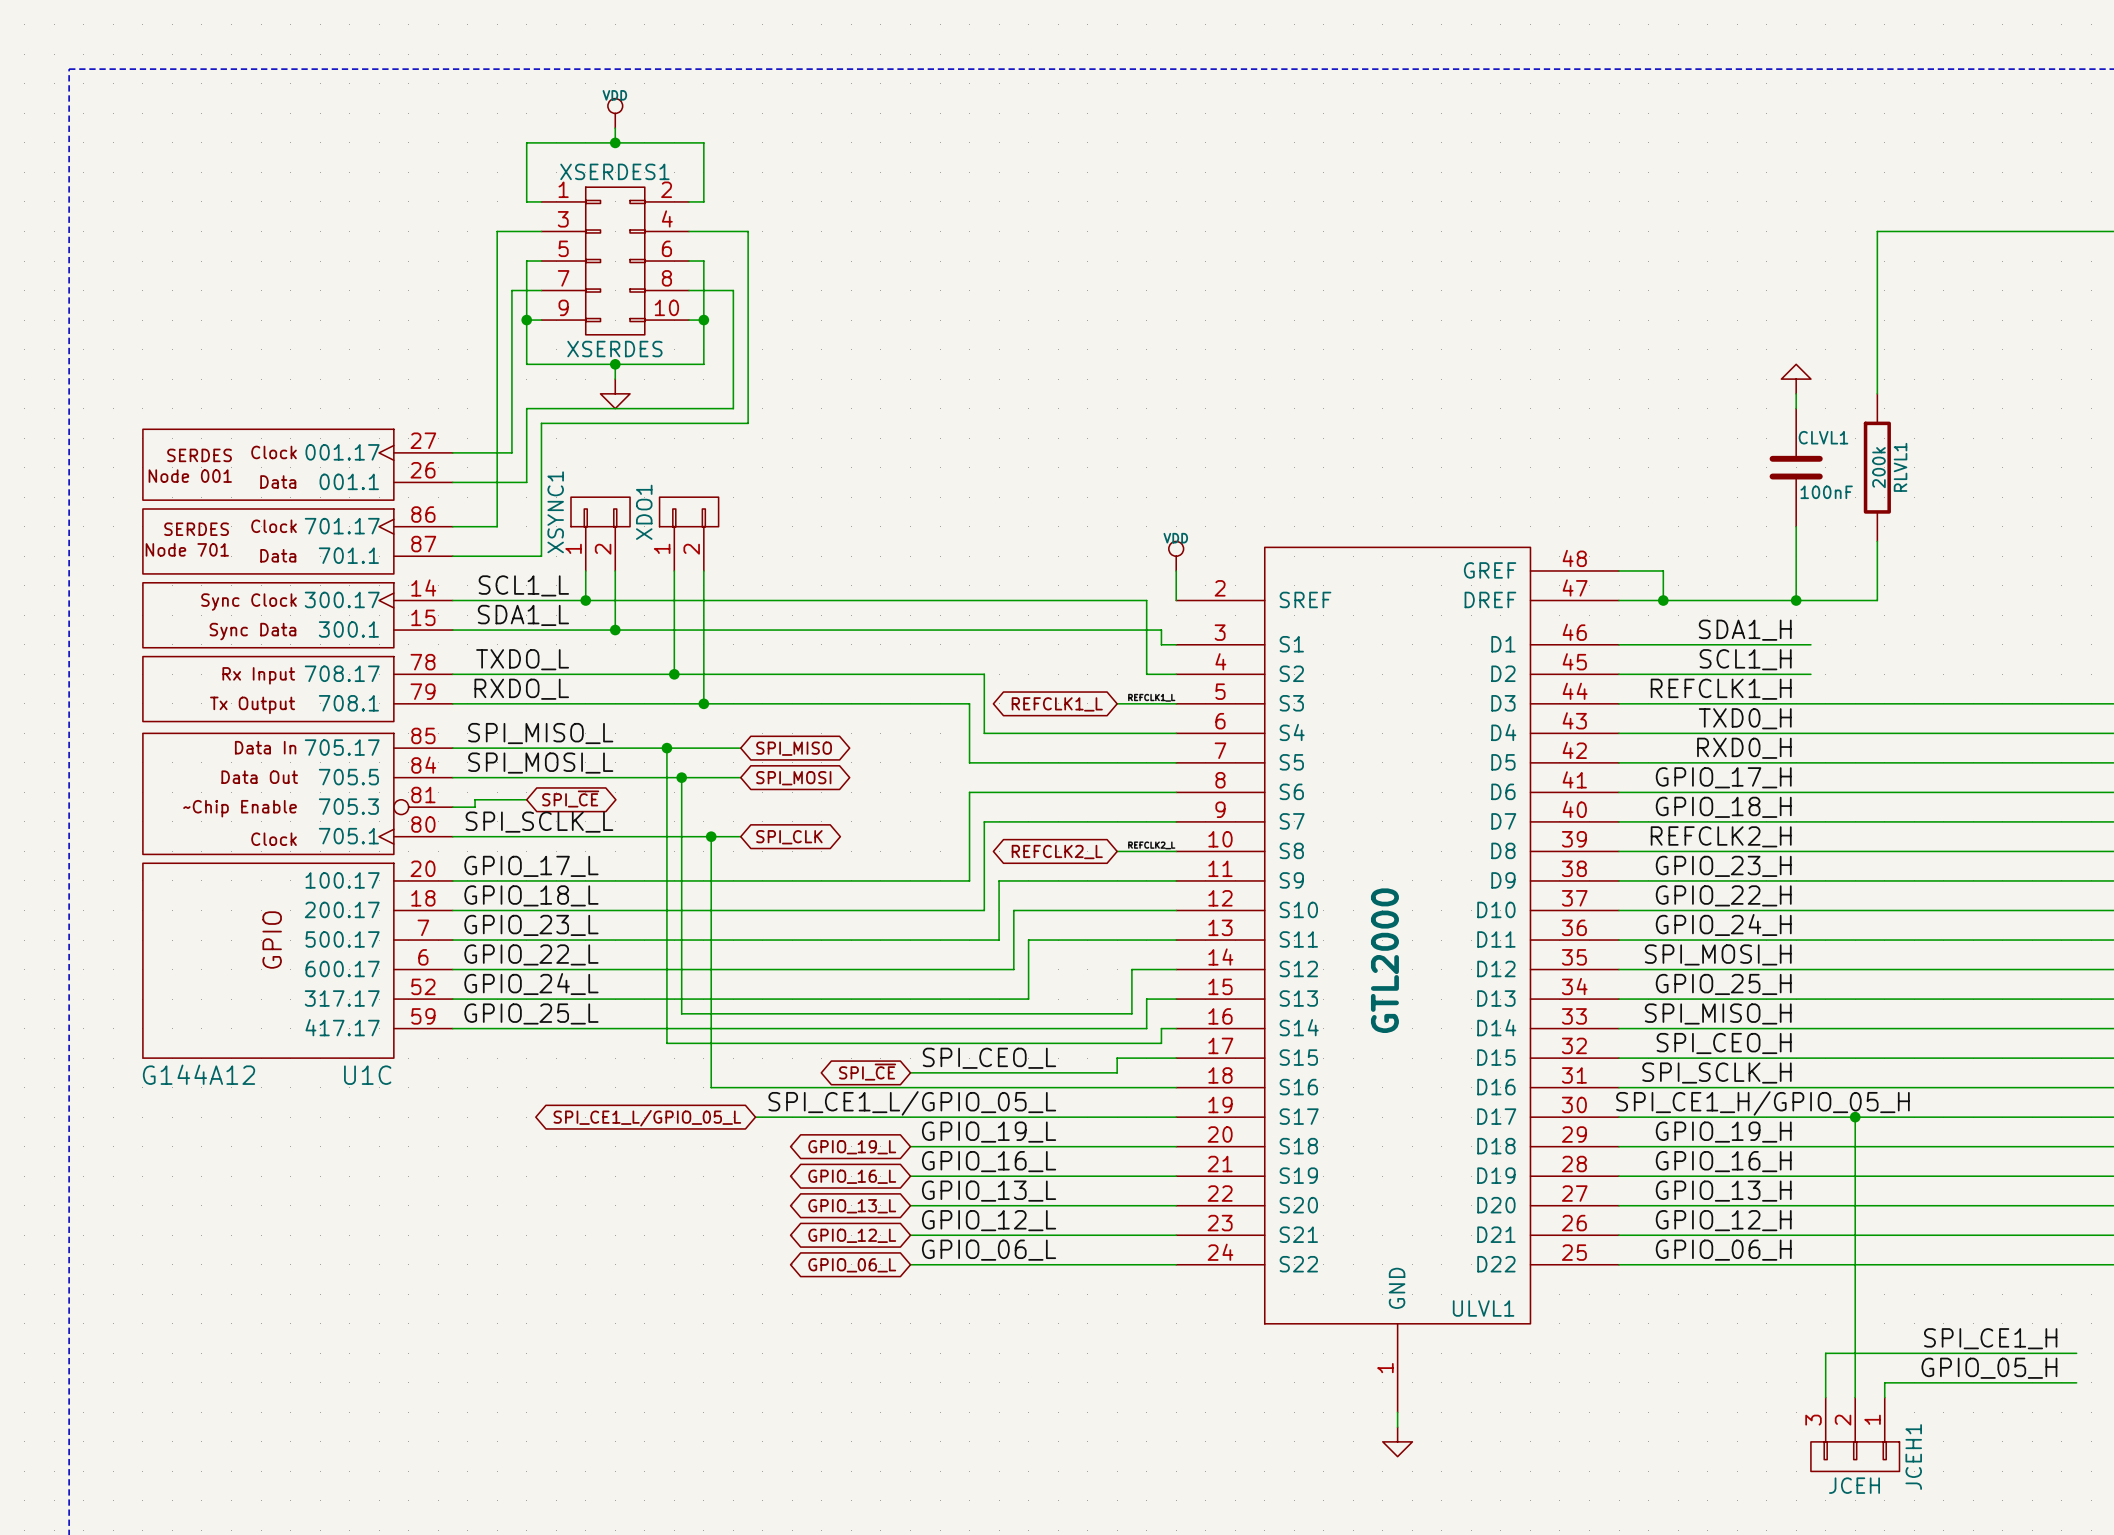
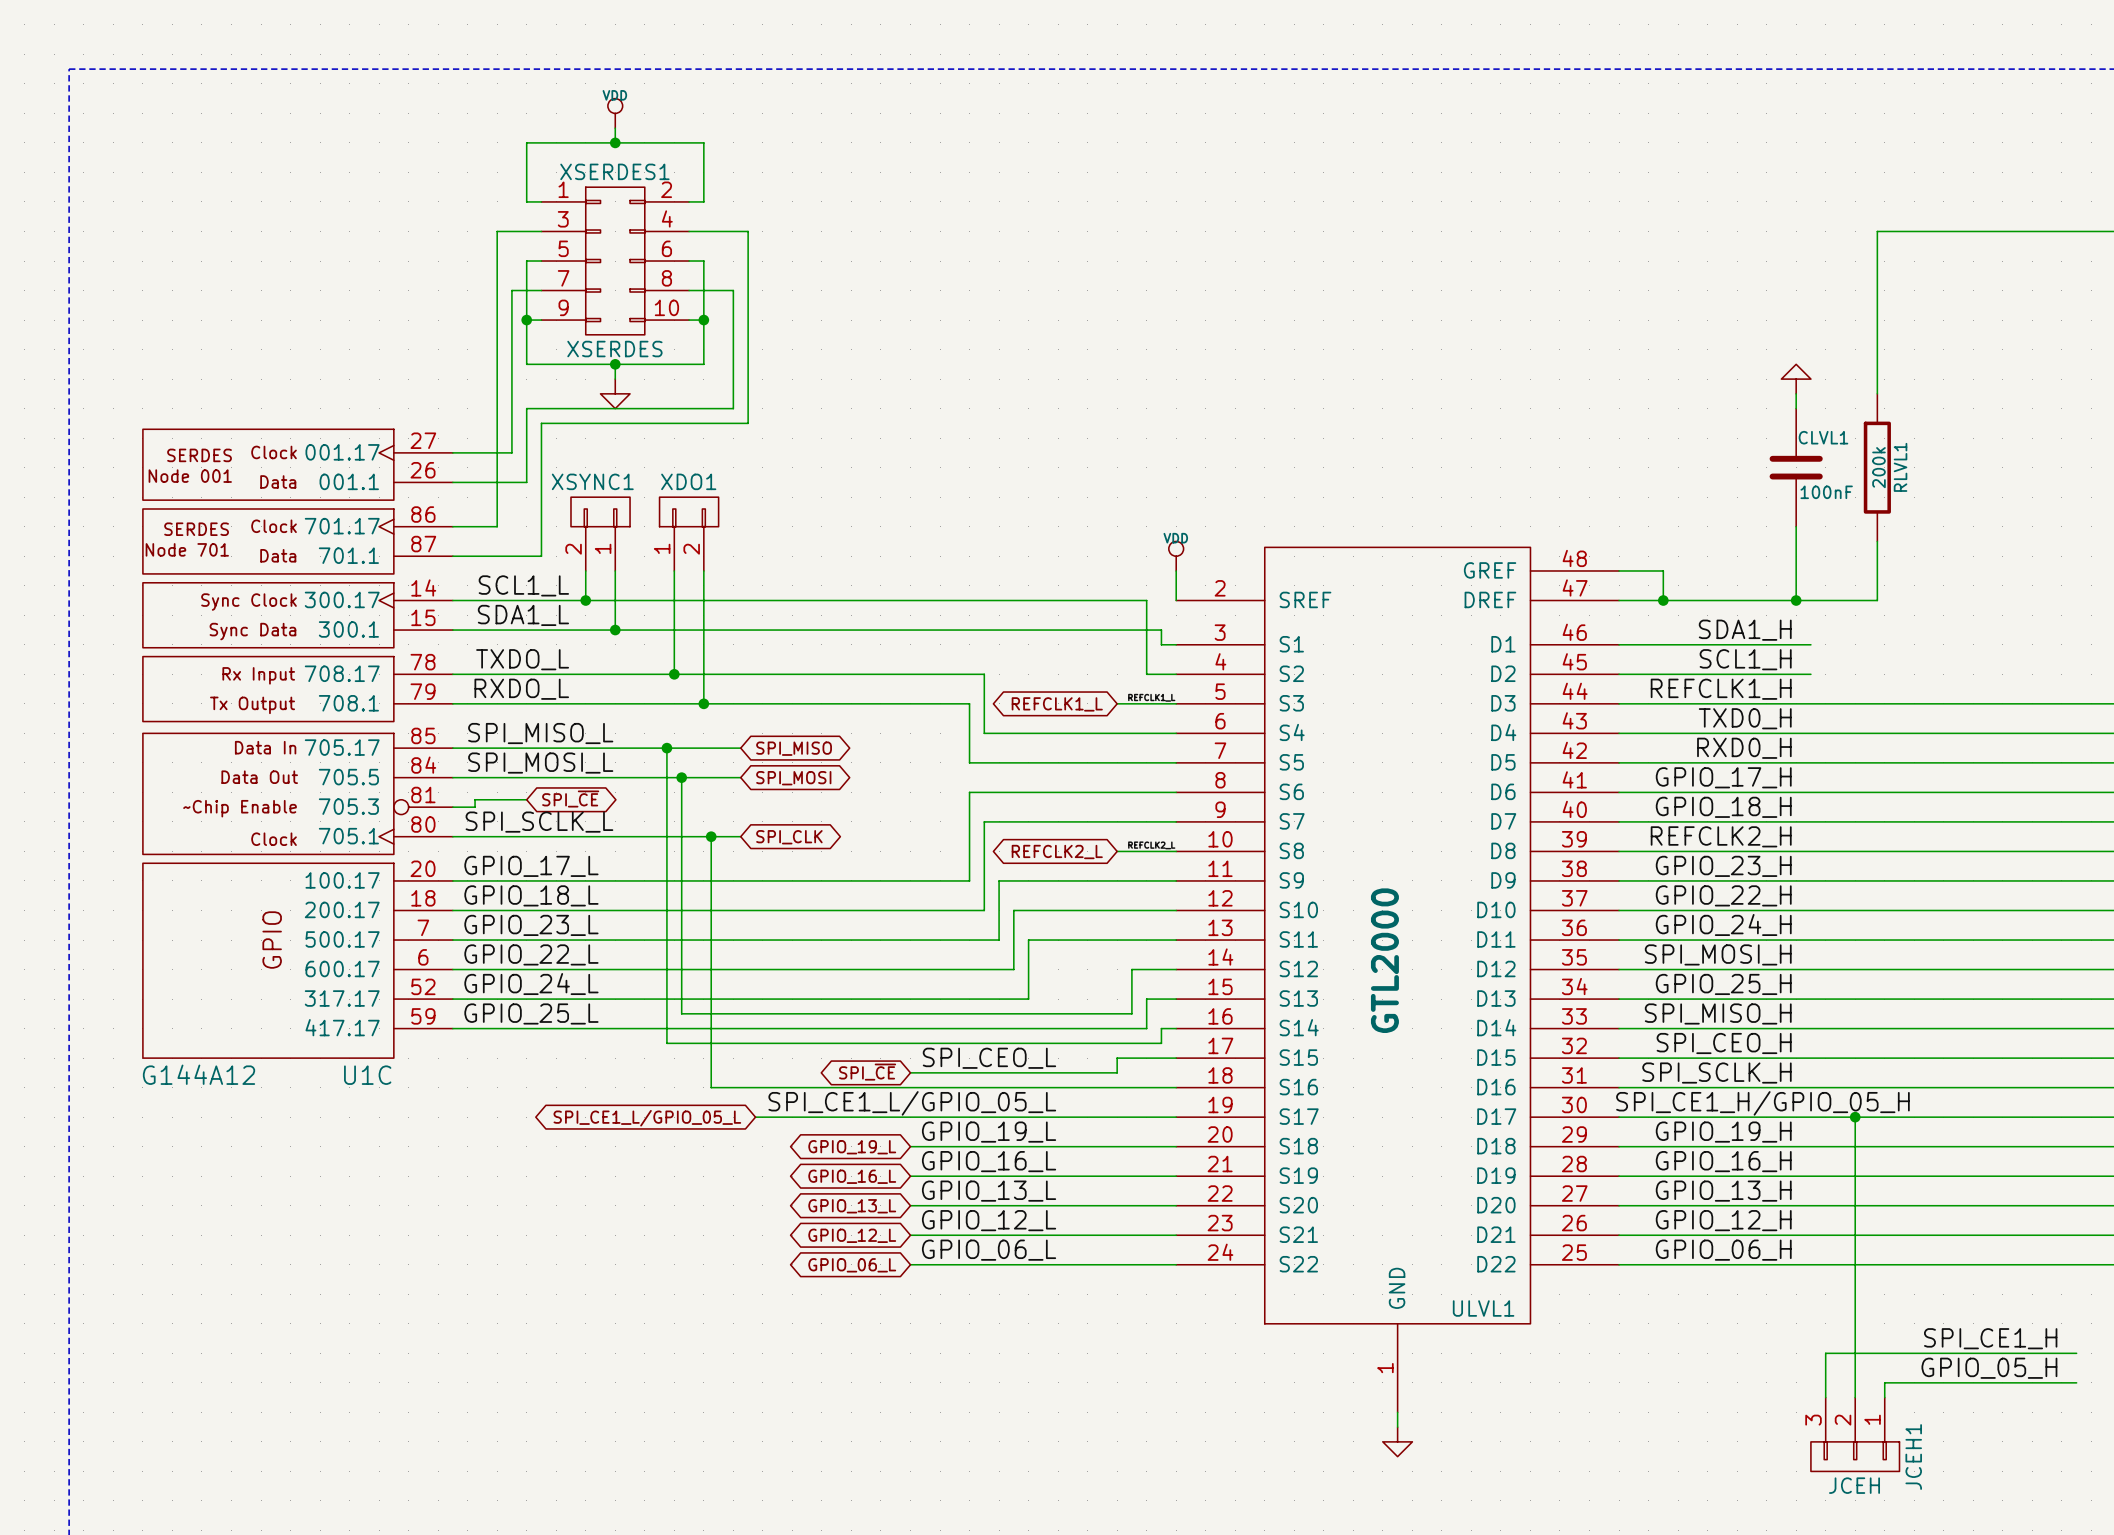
XSYNC1 flip: as is (600, 511) -> left-right (600, 511)
XSYNC1 name position: XSYNC1 (555, 512) -> XSYNC1 (592, 481)
XDO1 name rotation: 0° (644, 512) -> 90° clockwise (688, 481)

